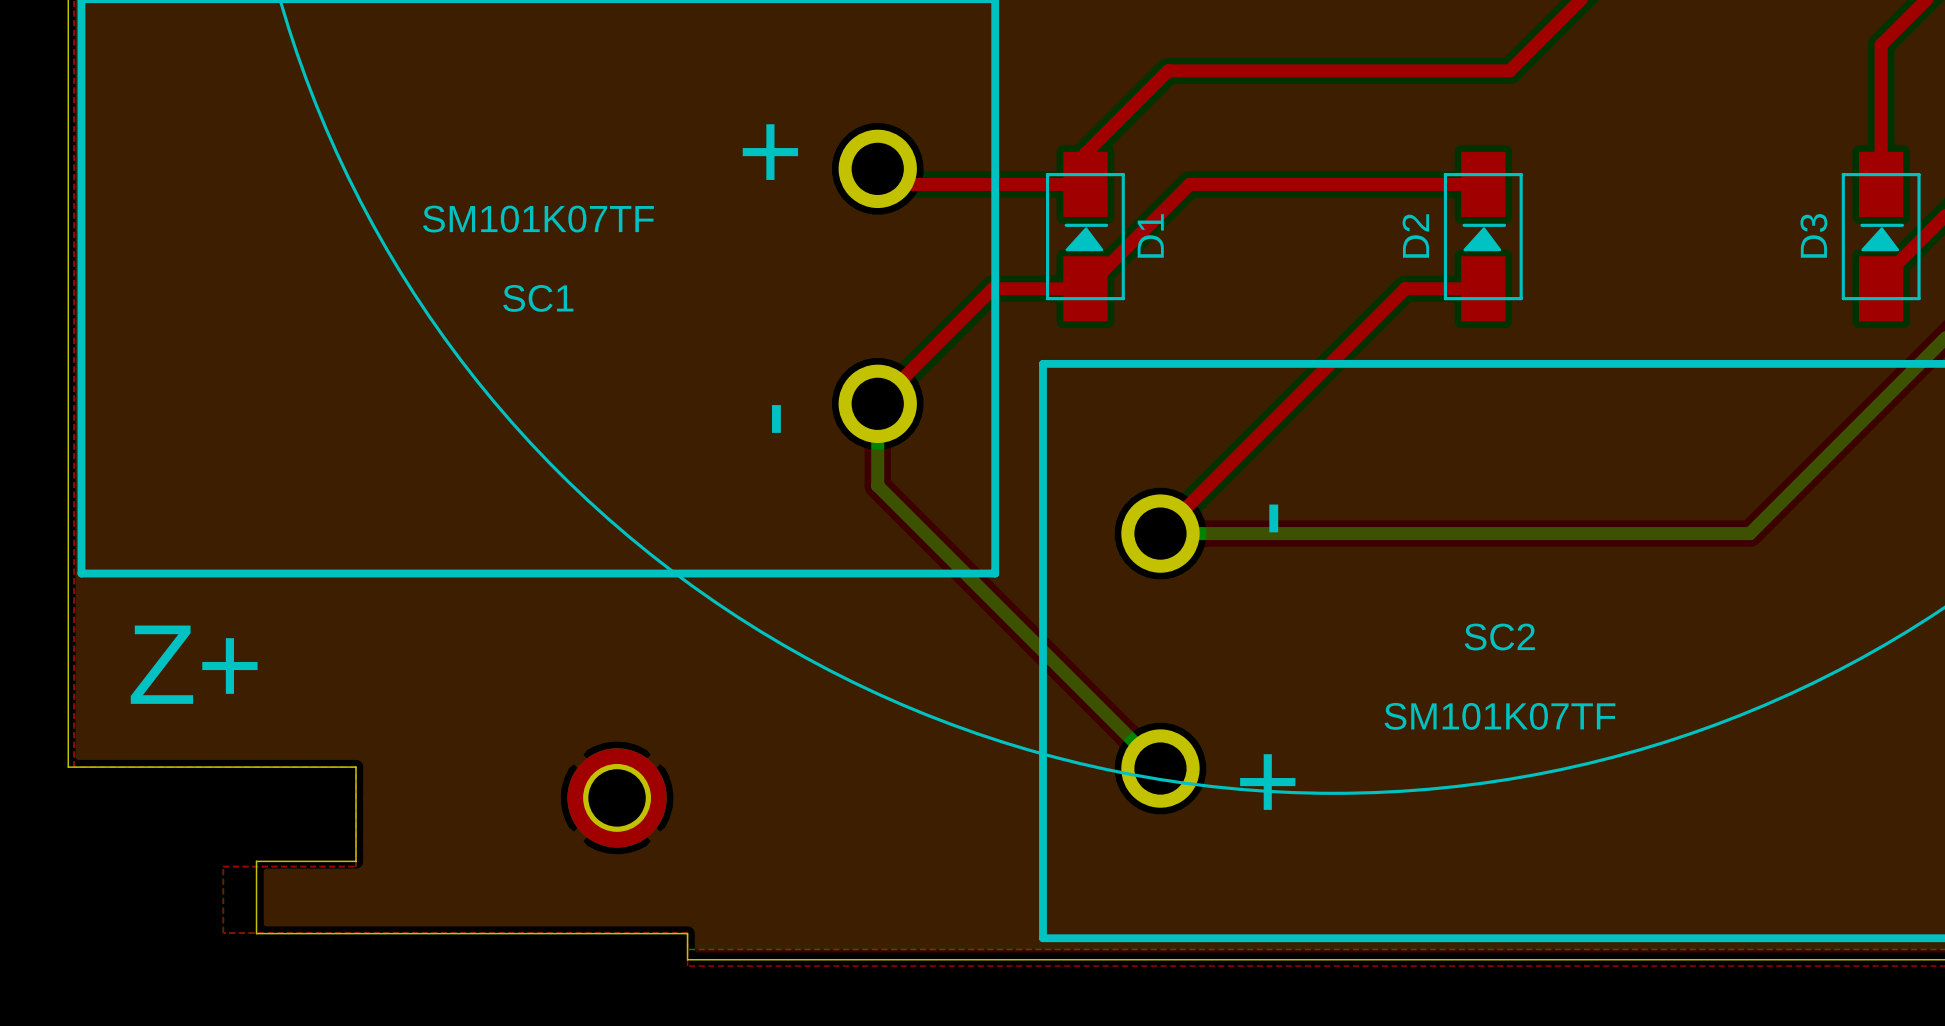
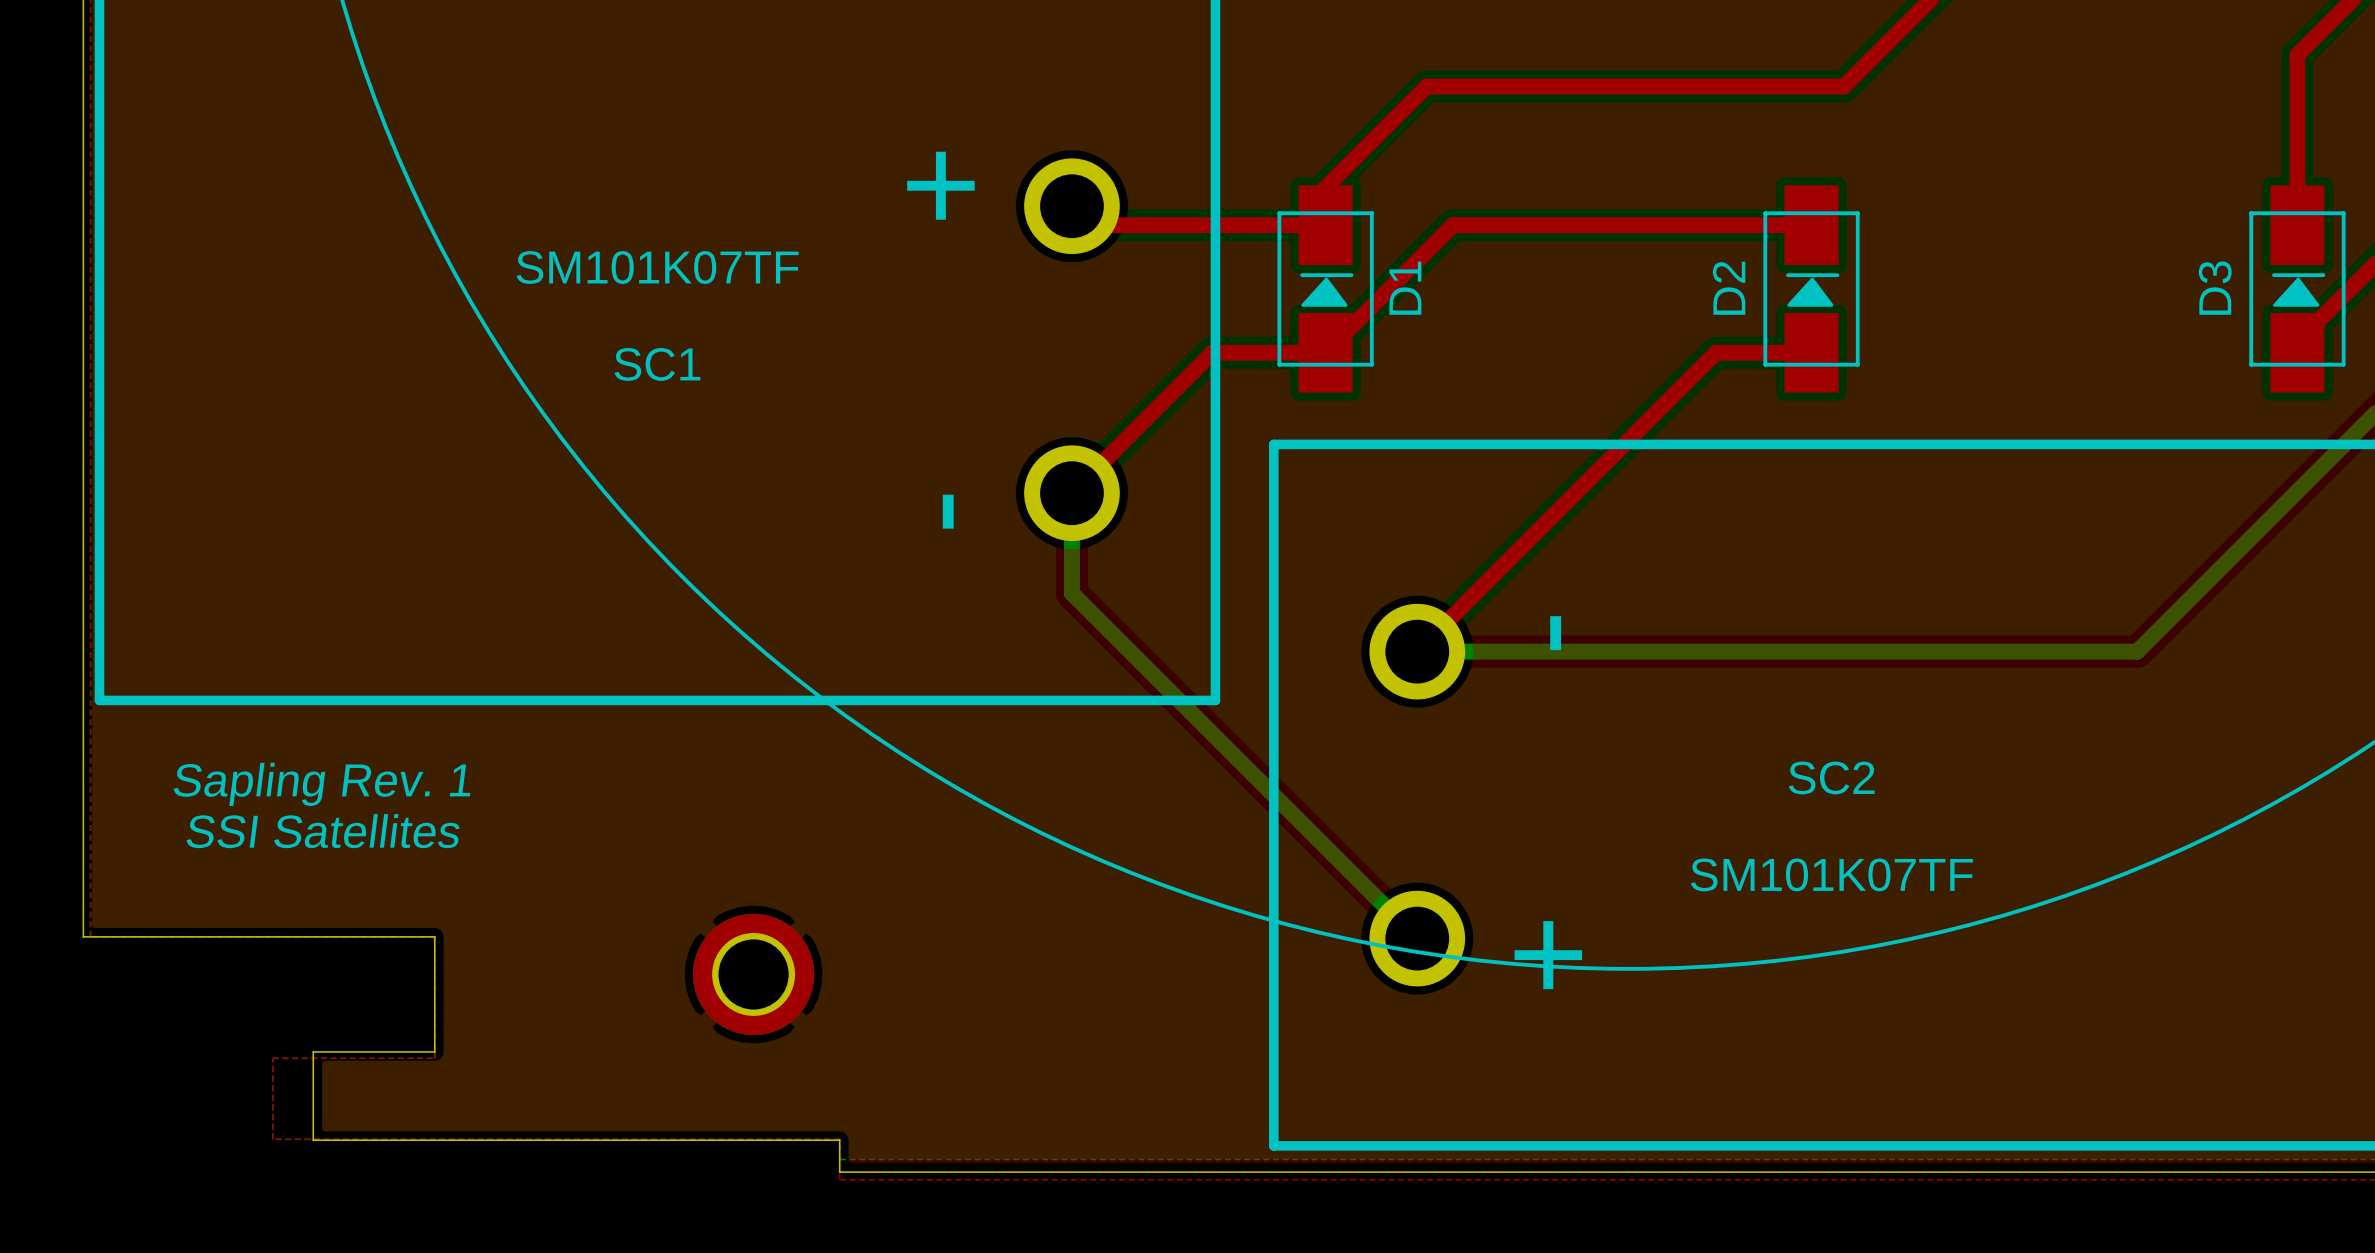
text: none -> Sapling Rev. 1 (321, 784)
text: Z+ (194, 664) -> none
text: none -> SSI Satellites (323, 831)

